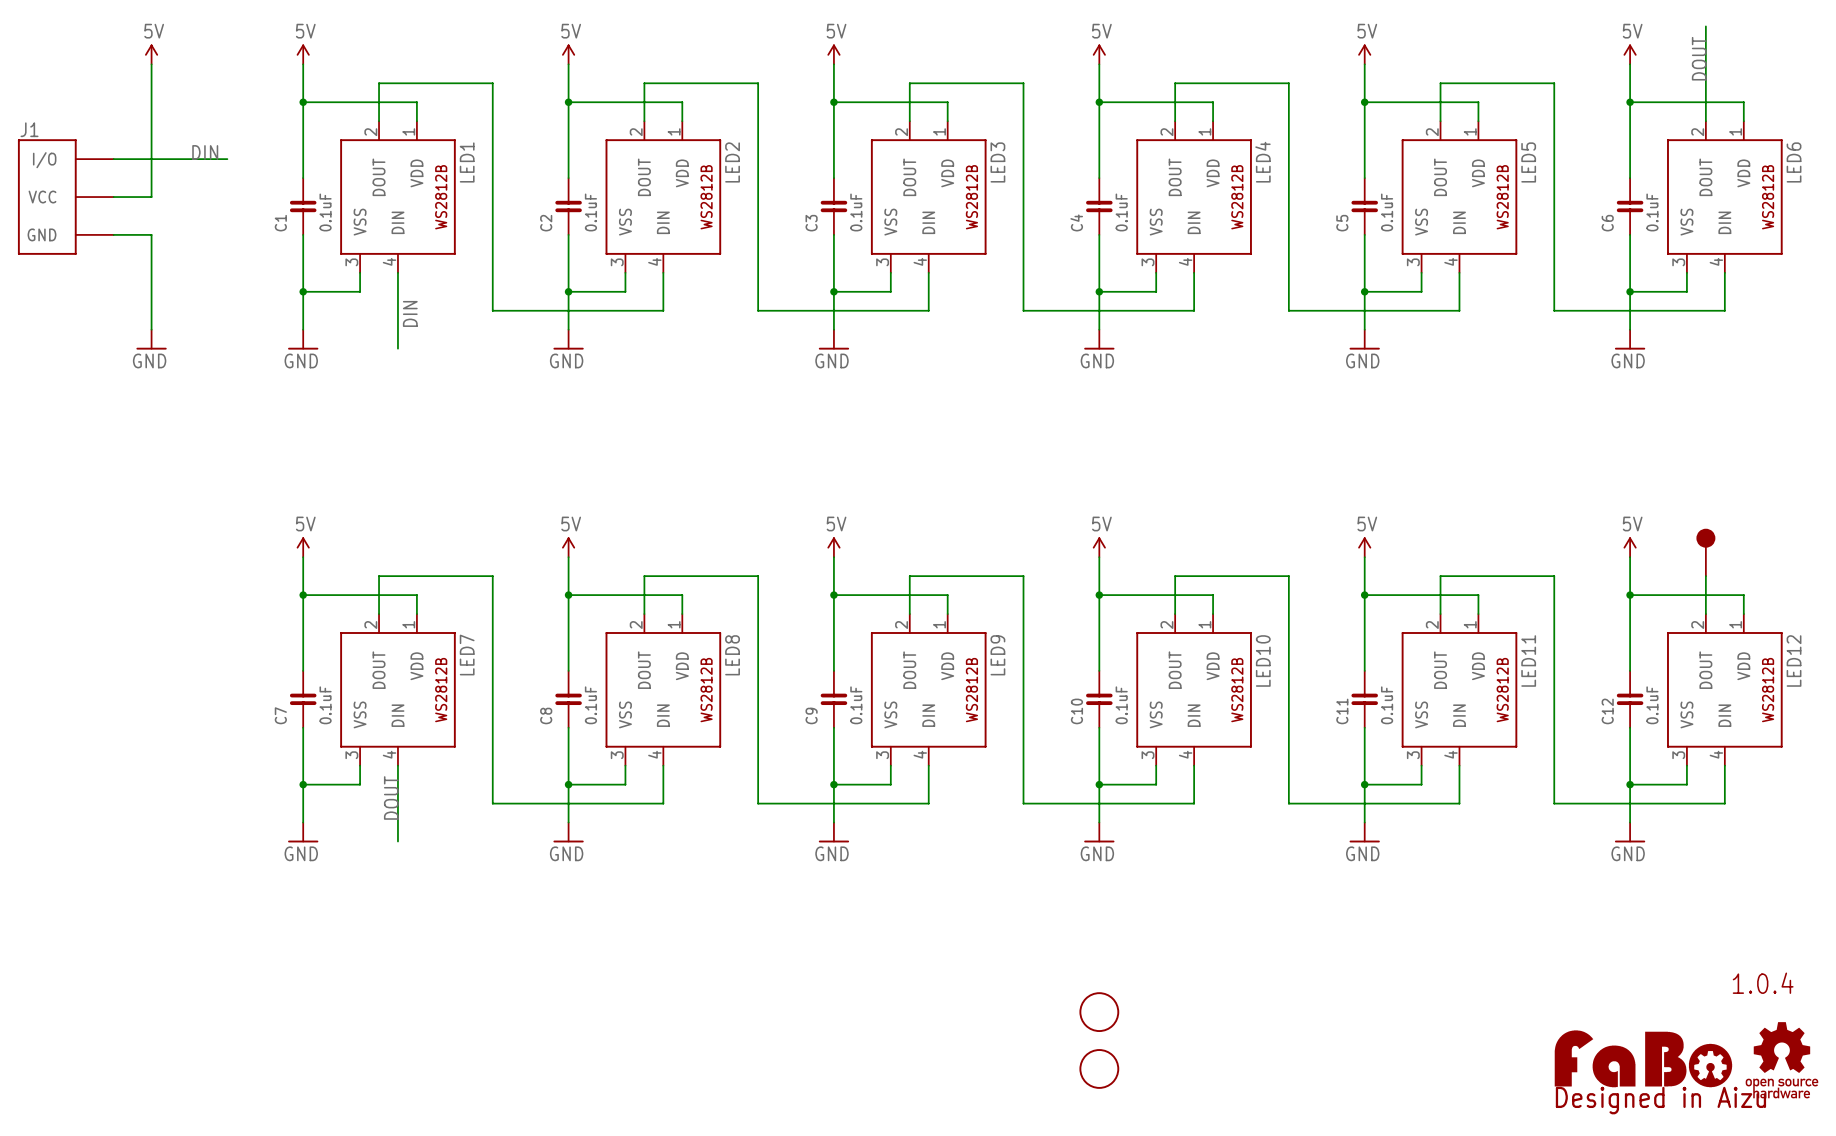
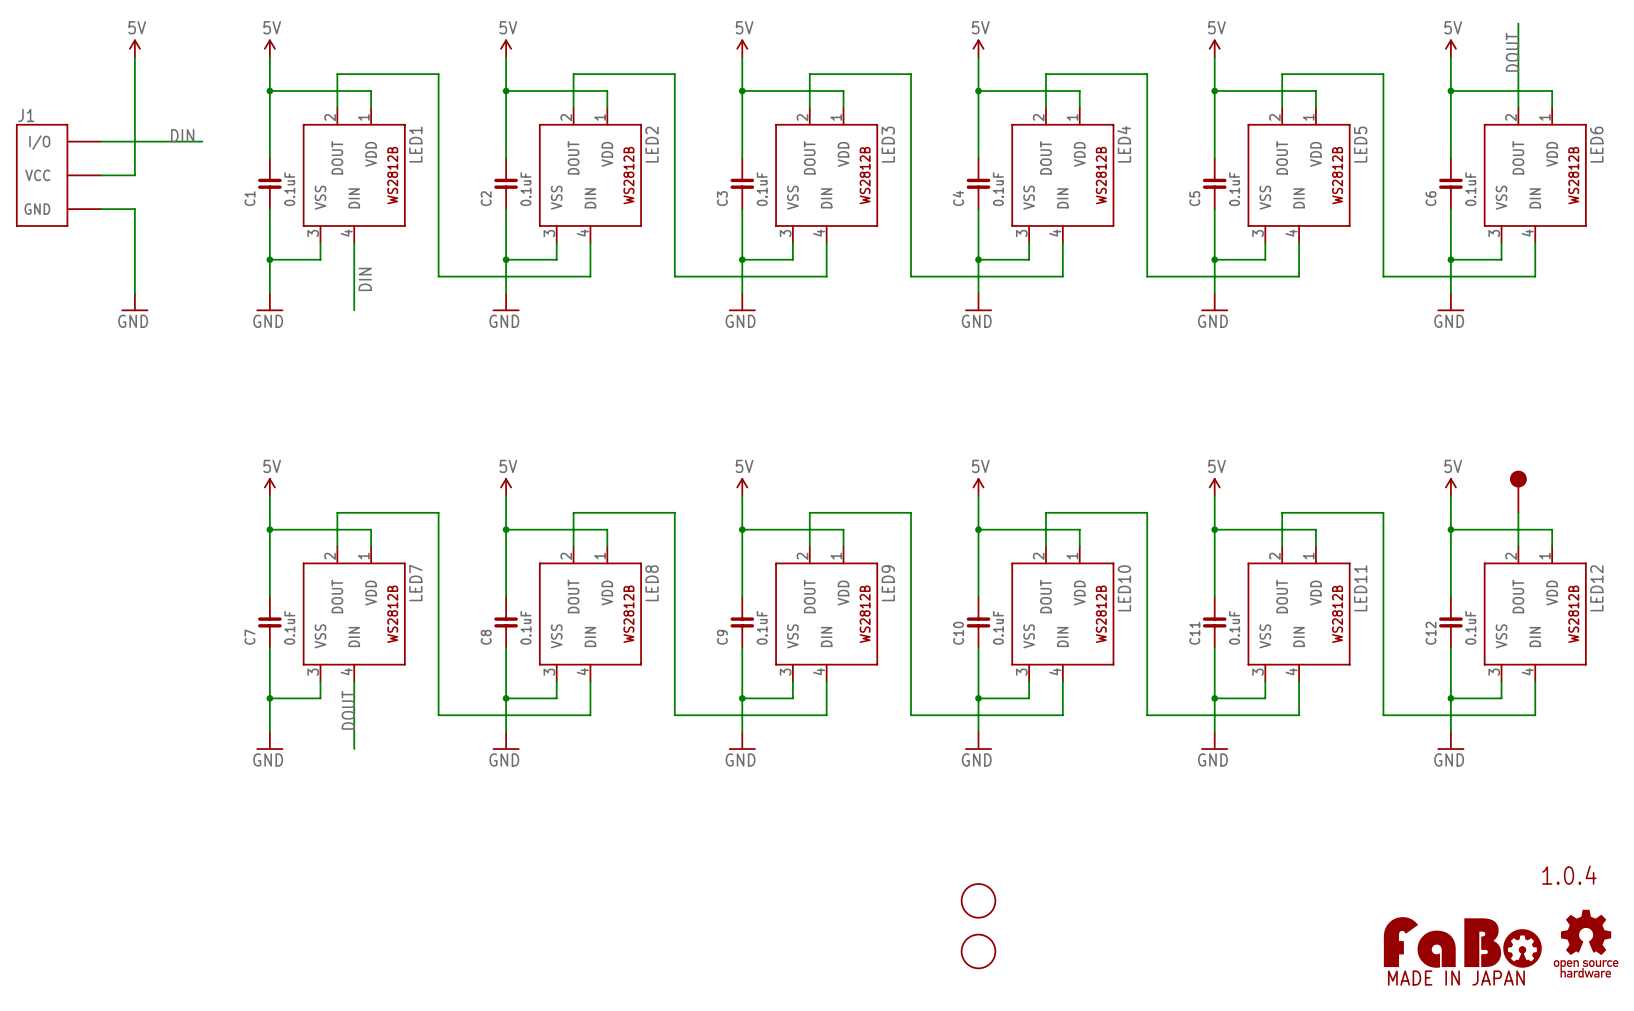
part text: none -> MADE IN JAPAN (1456, 978)
part text: Designed in Aizu (1660, 1100) -> none

